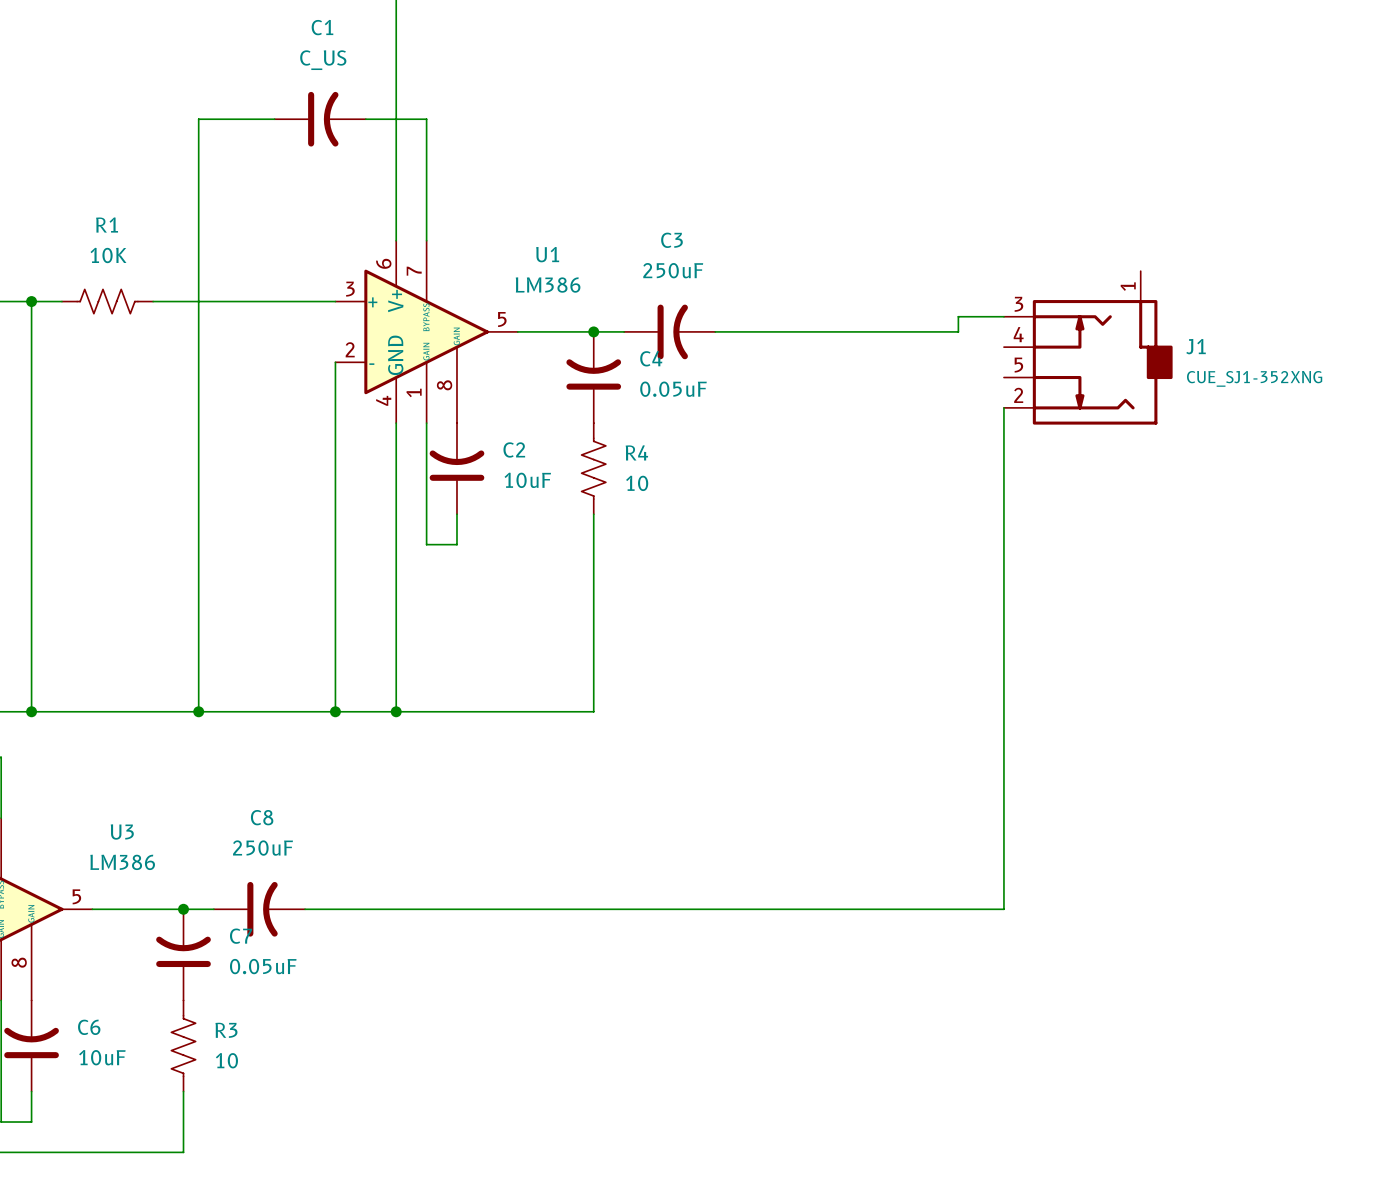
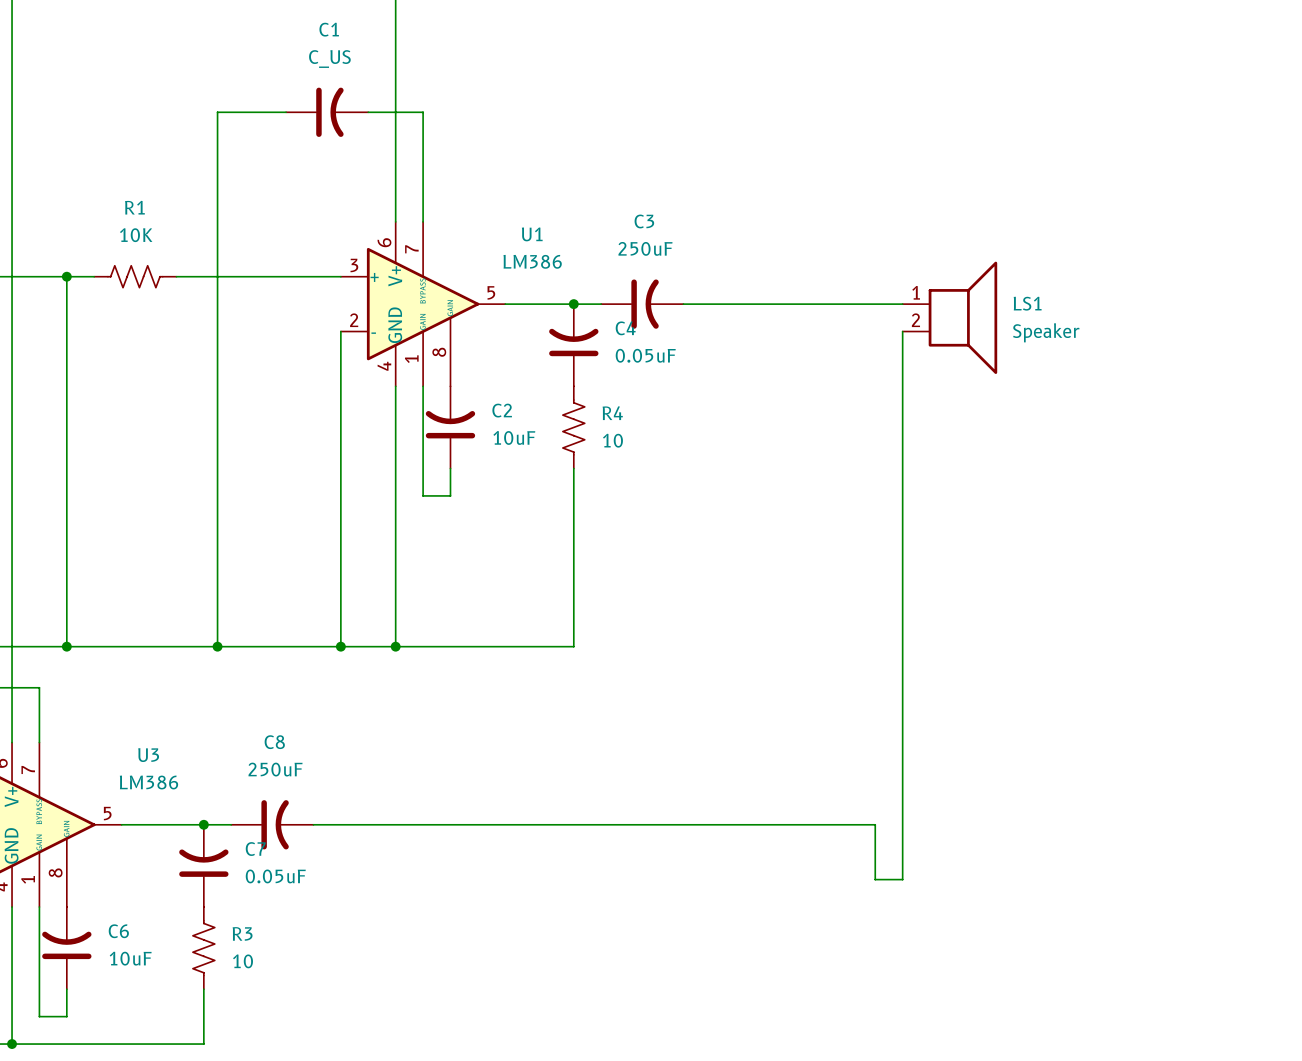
wire: (1003, 316) (958, 316) (958, 331) -> none
LS1: none -> Speaker (949, 317)
J1: CUE_SJ1-352XNG (1088, 347) -> none
wire: (1003, 407) (1003, 909) (927, 909) -> (902, 331) (902, 879) (875, 879) (875, 824)

